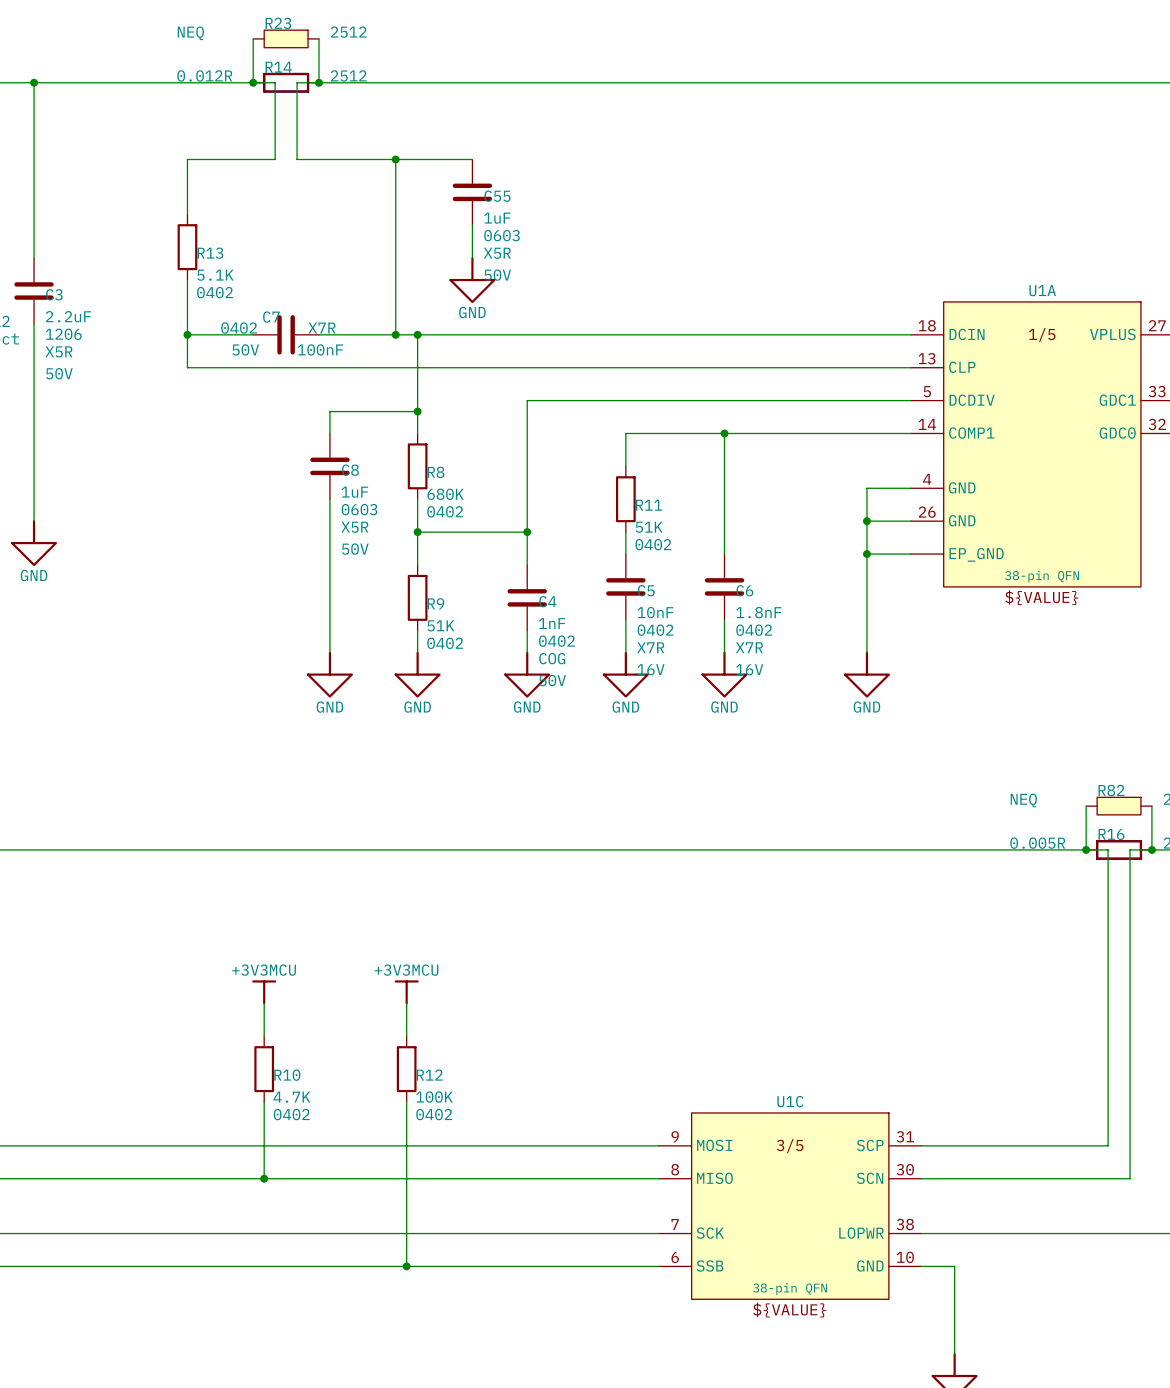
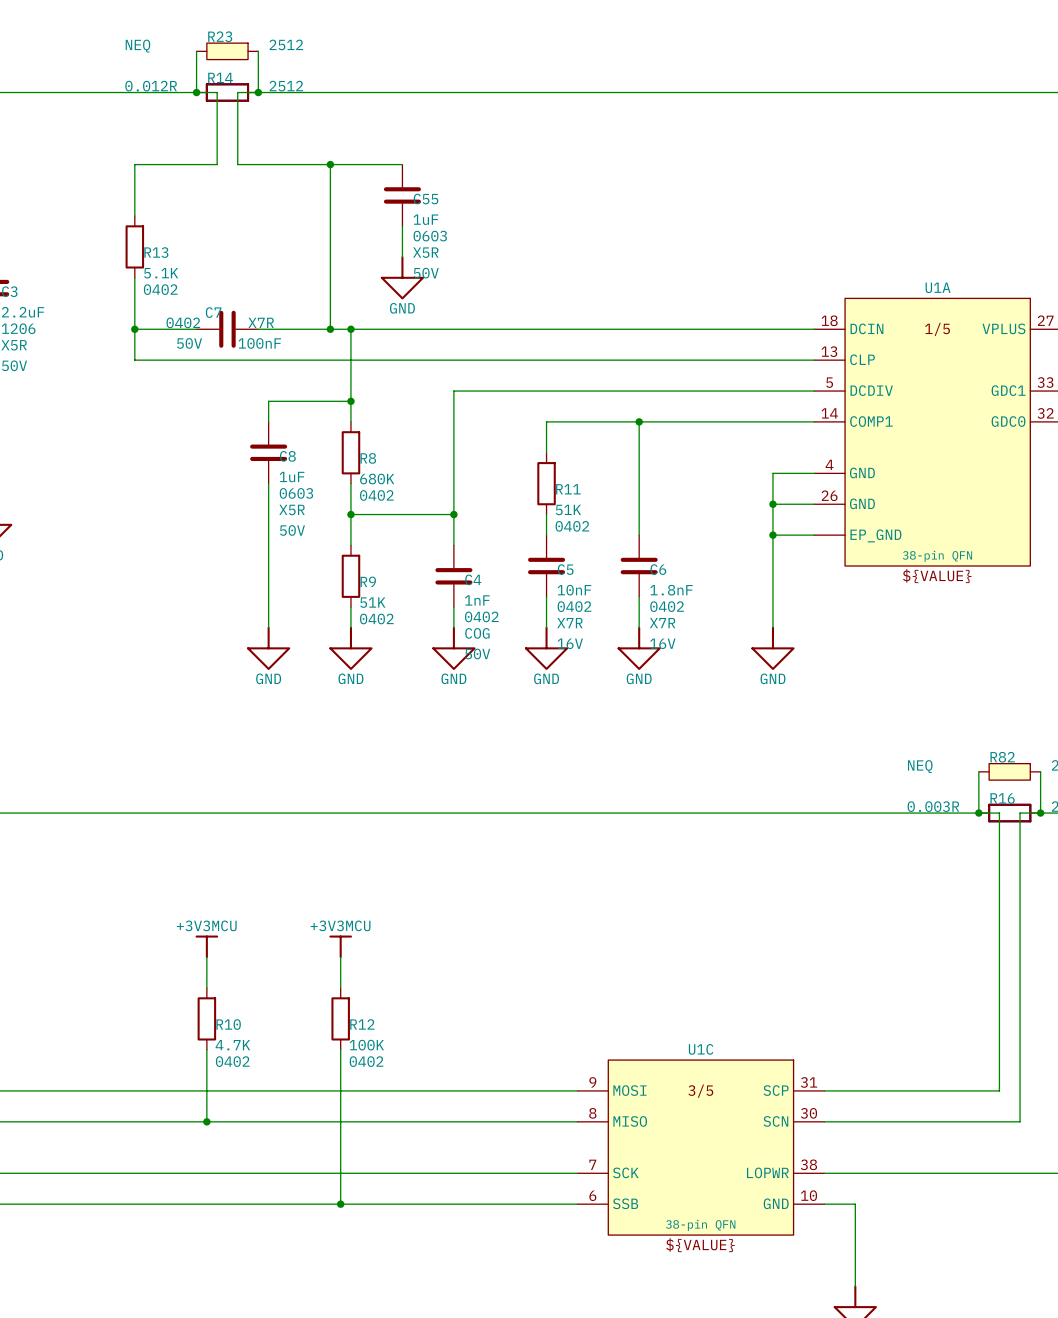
R16 value: 0.005R (1037, 843) -> 0.003R (933, 806)

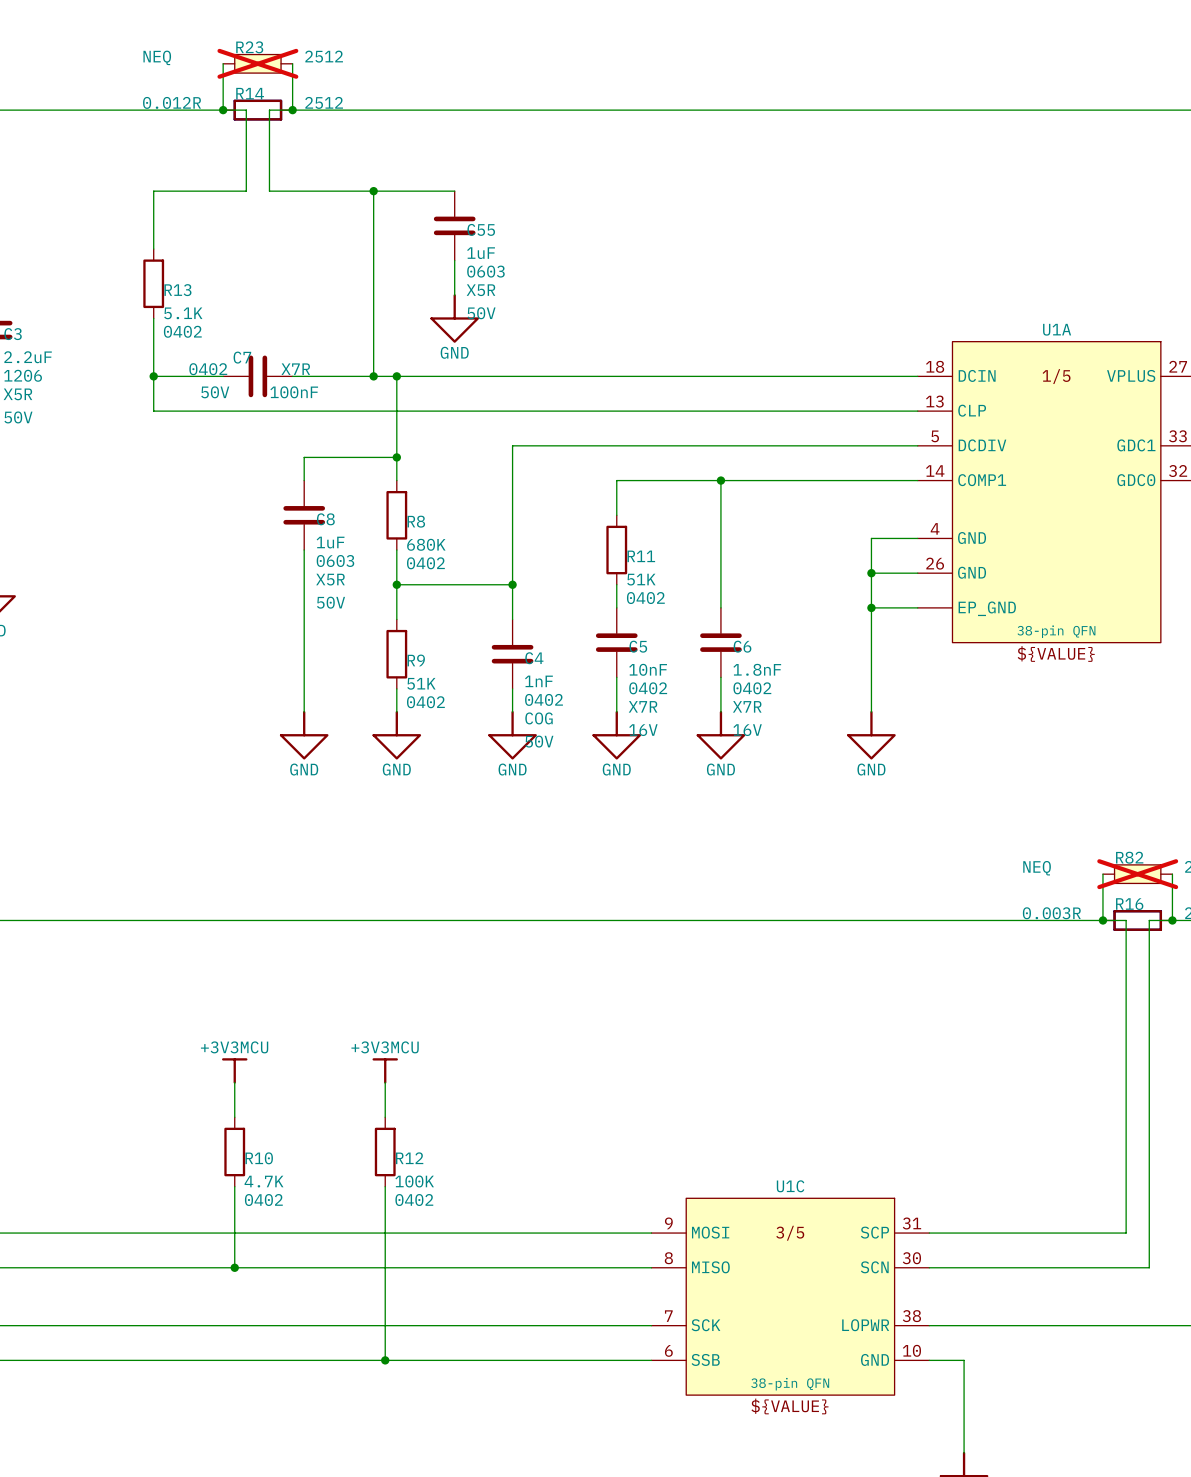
R23 do-not-place cross: none -> (257, 63)
R82 do-not-place cross: none -> (1137, 874)

